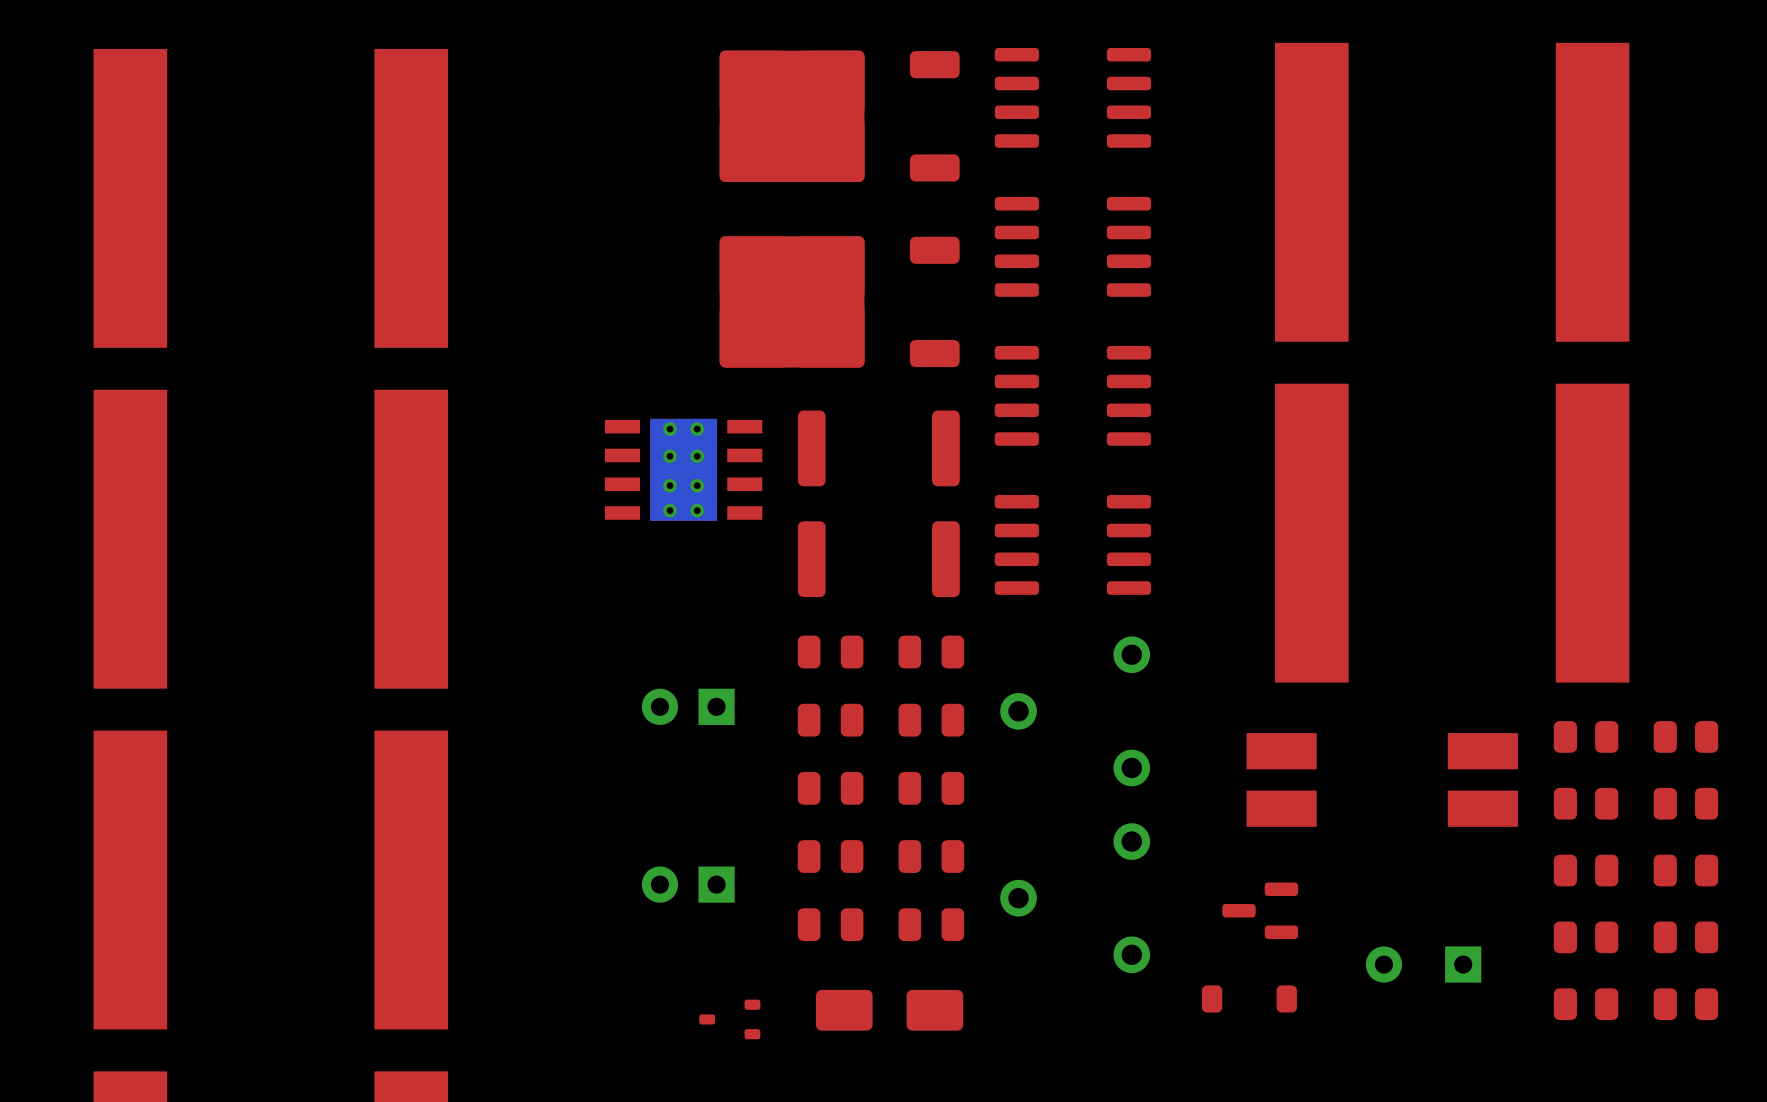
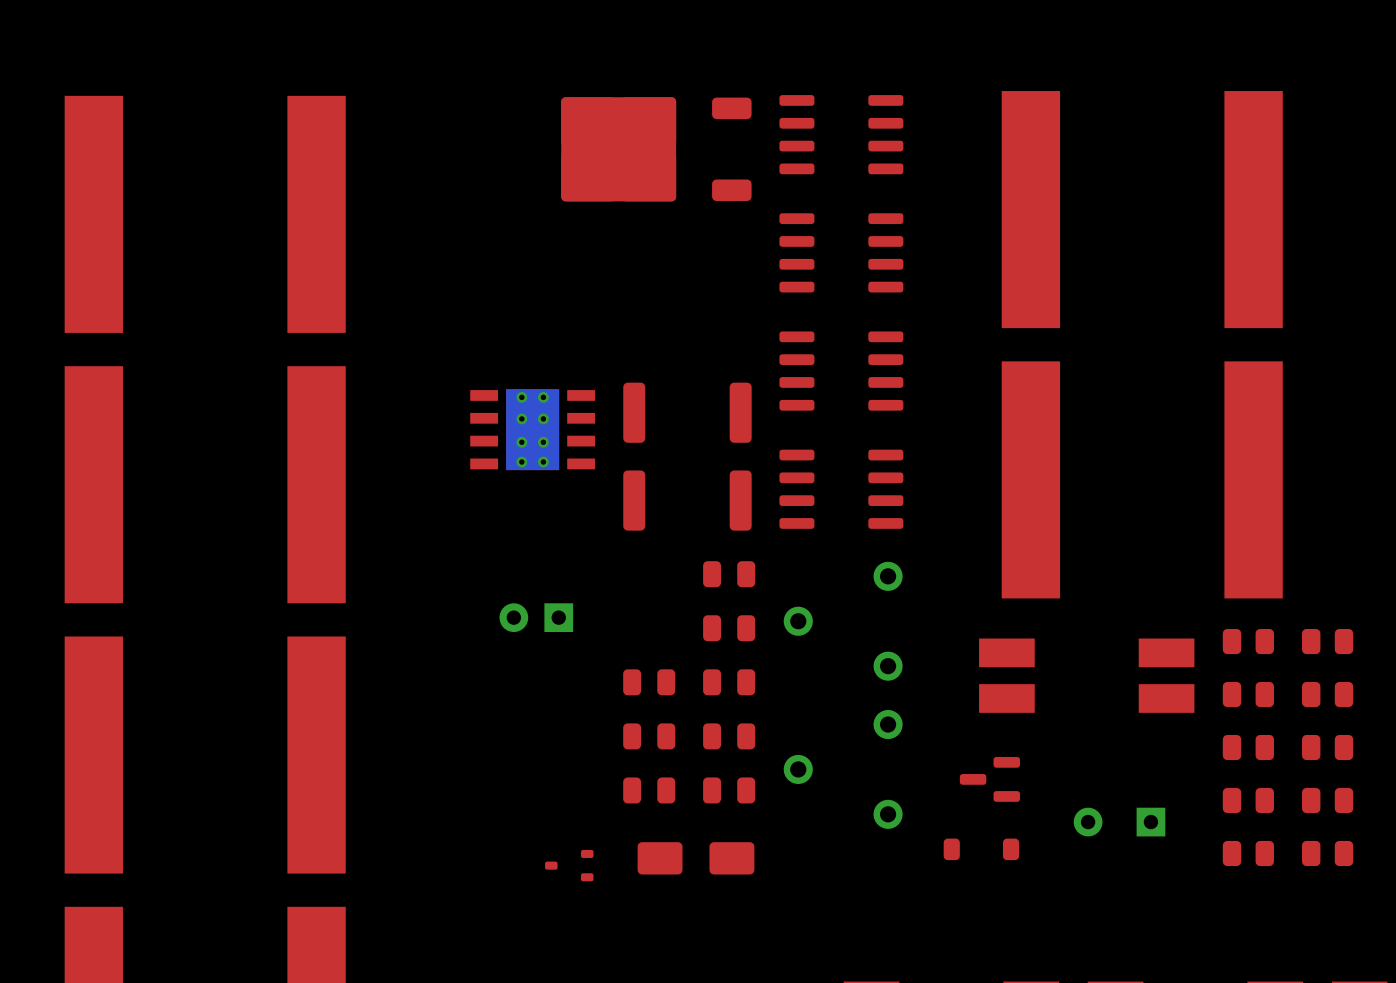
part: (839, 301) -> none
part: (830, 652) -> none
part: (830, 720) -> none
part: (688, 884) -> none

